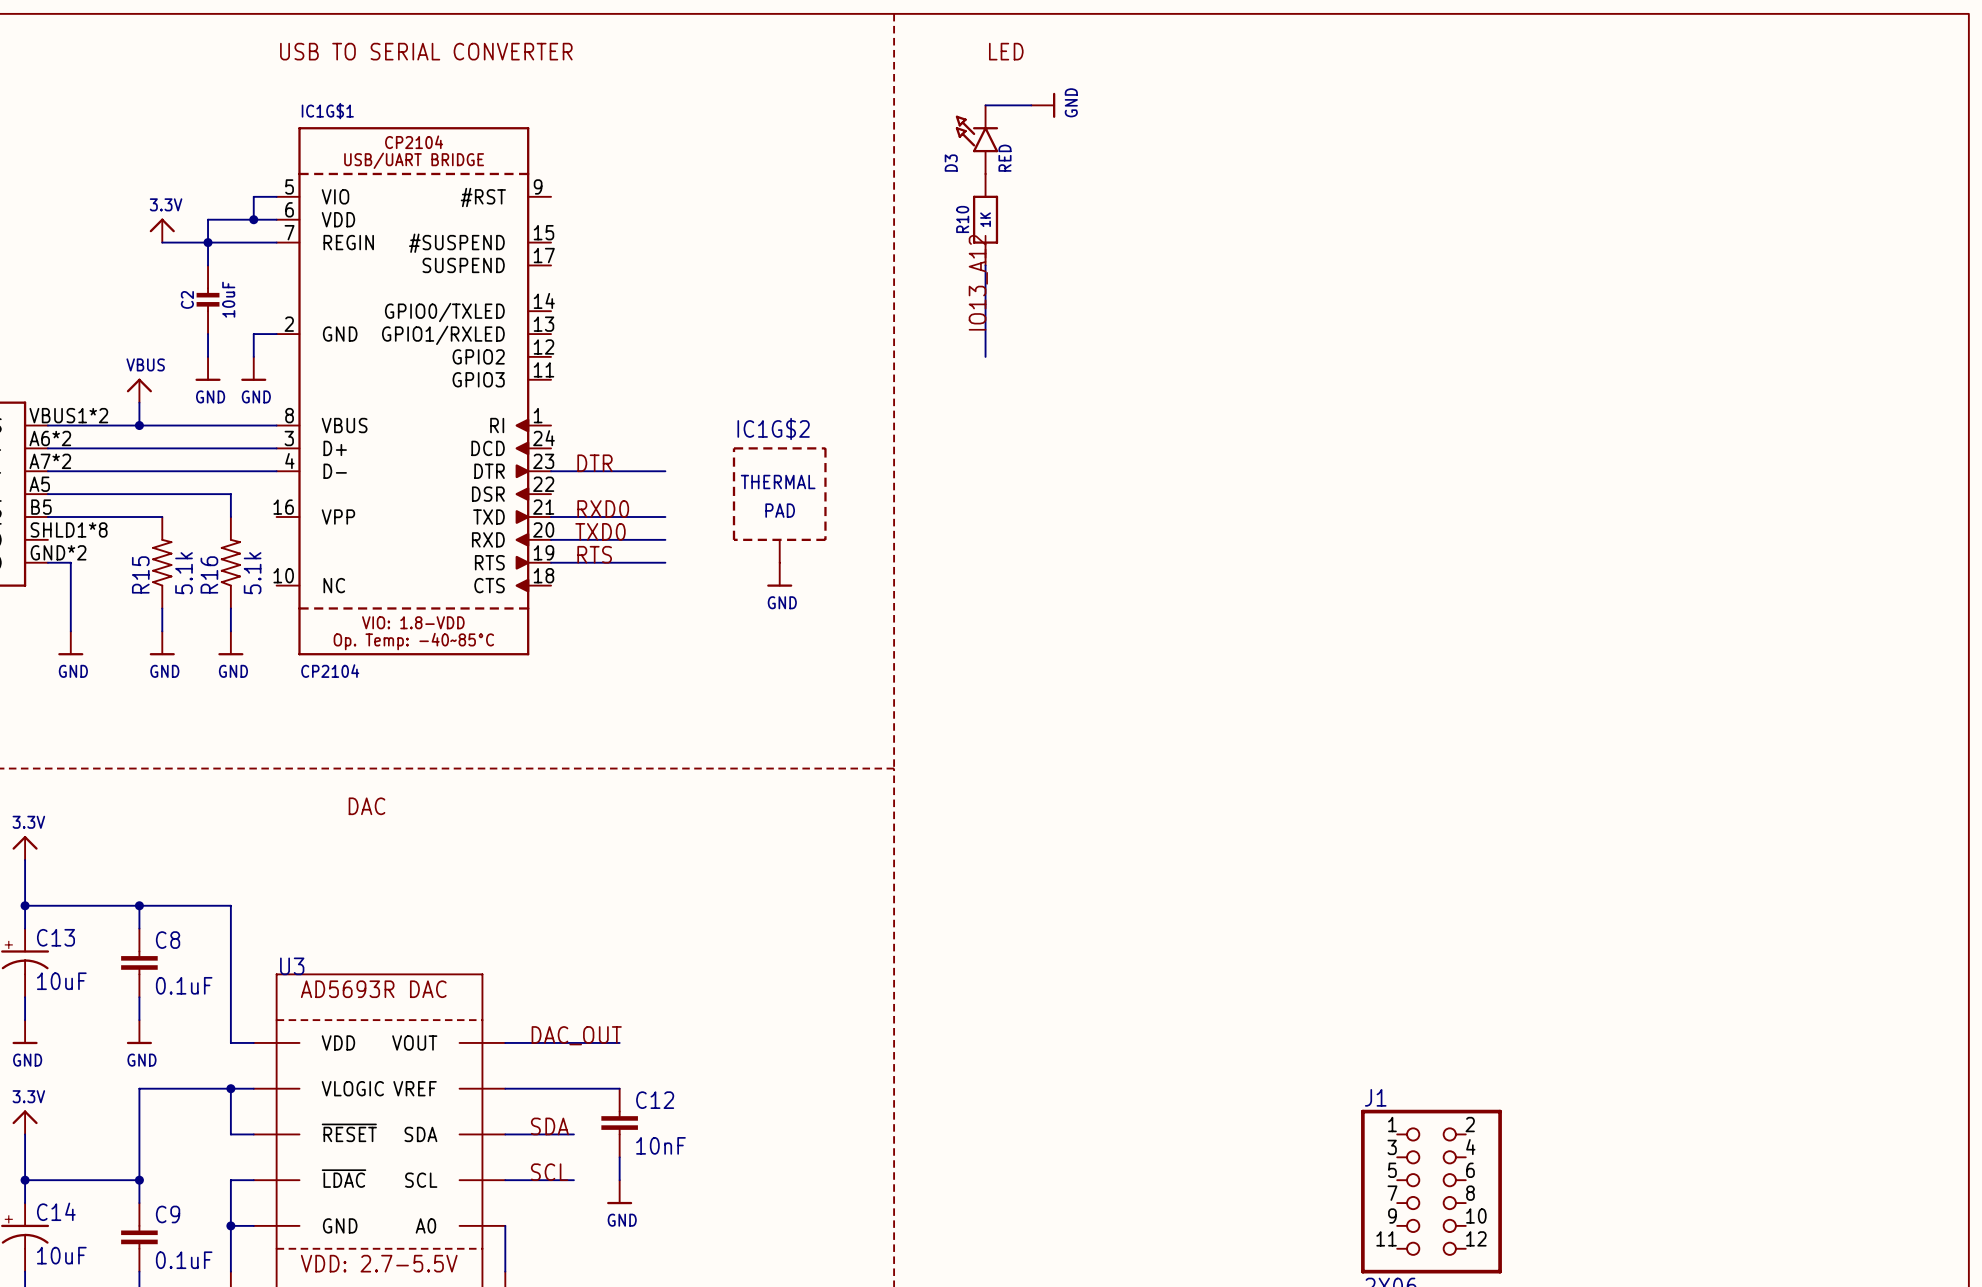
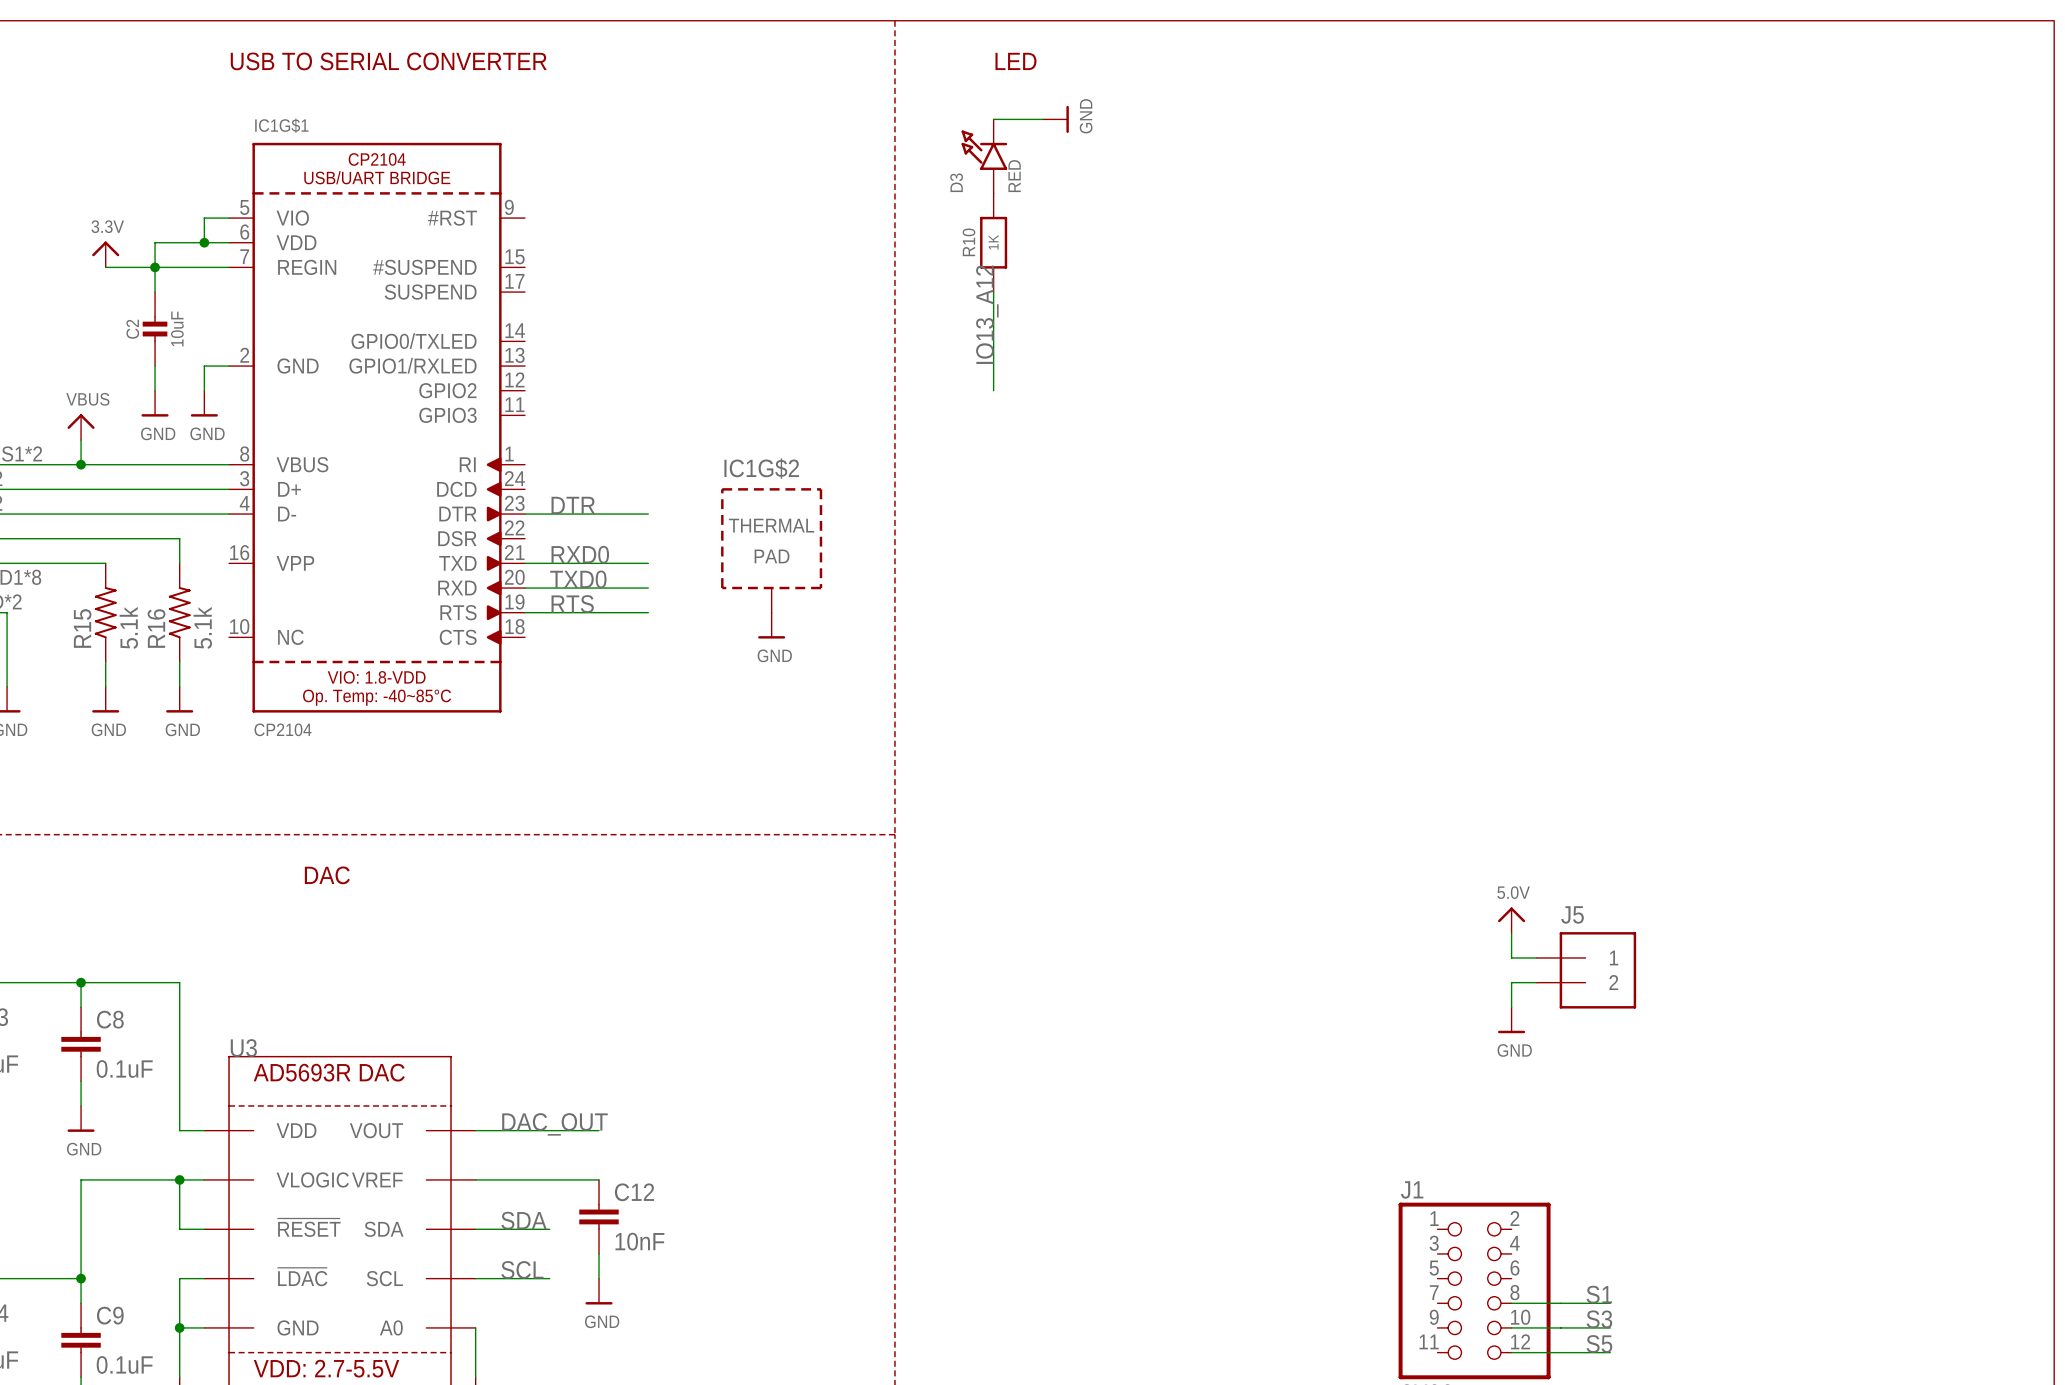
power symbol: none -> 5.0V (1511, 920)
wire: none -> (1511, 933) (1511, 957) (1536, 957)
J5: none -> (1586, 970)
wire: none -> (1536, 982) (1511, 982) (1511, 1007)
power symbol: none -> GND (1511, 1020)
label: none -> S1 (1599, 1294)
wire: none -> (1511, 1303) (1610, 1303)
label: none -> S3 (1599, 1319)
wire: none -> (1511, 1327) (1610, 1327)
label: none -> S5 (1599, 1343)
wire: none -> (1511, 1352) (1610, 1352)

